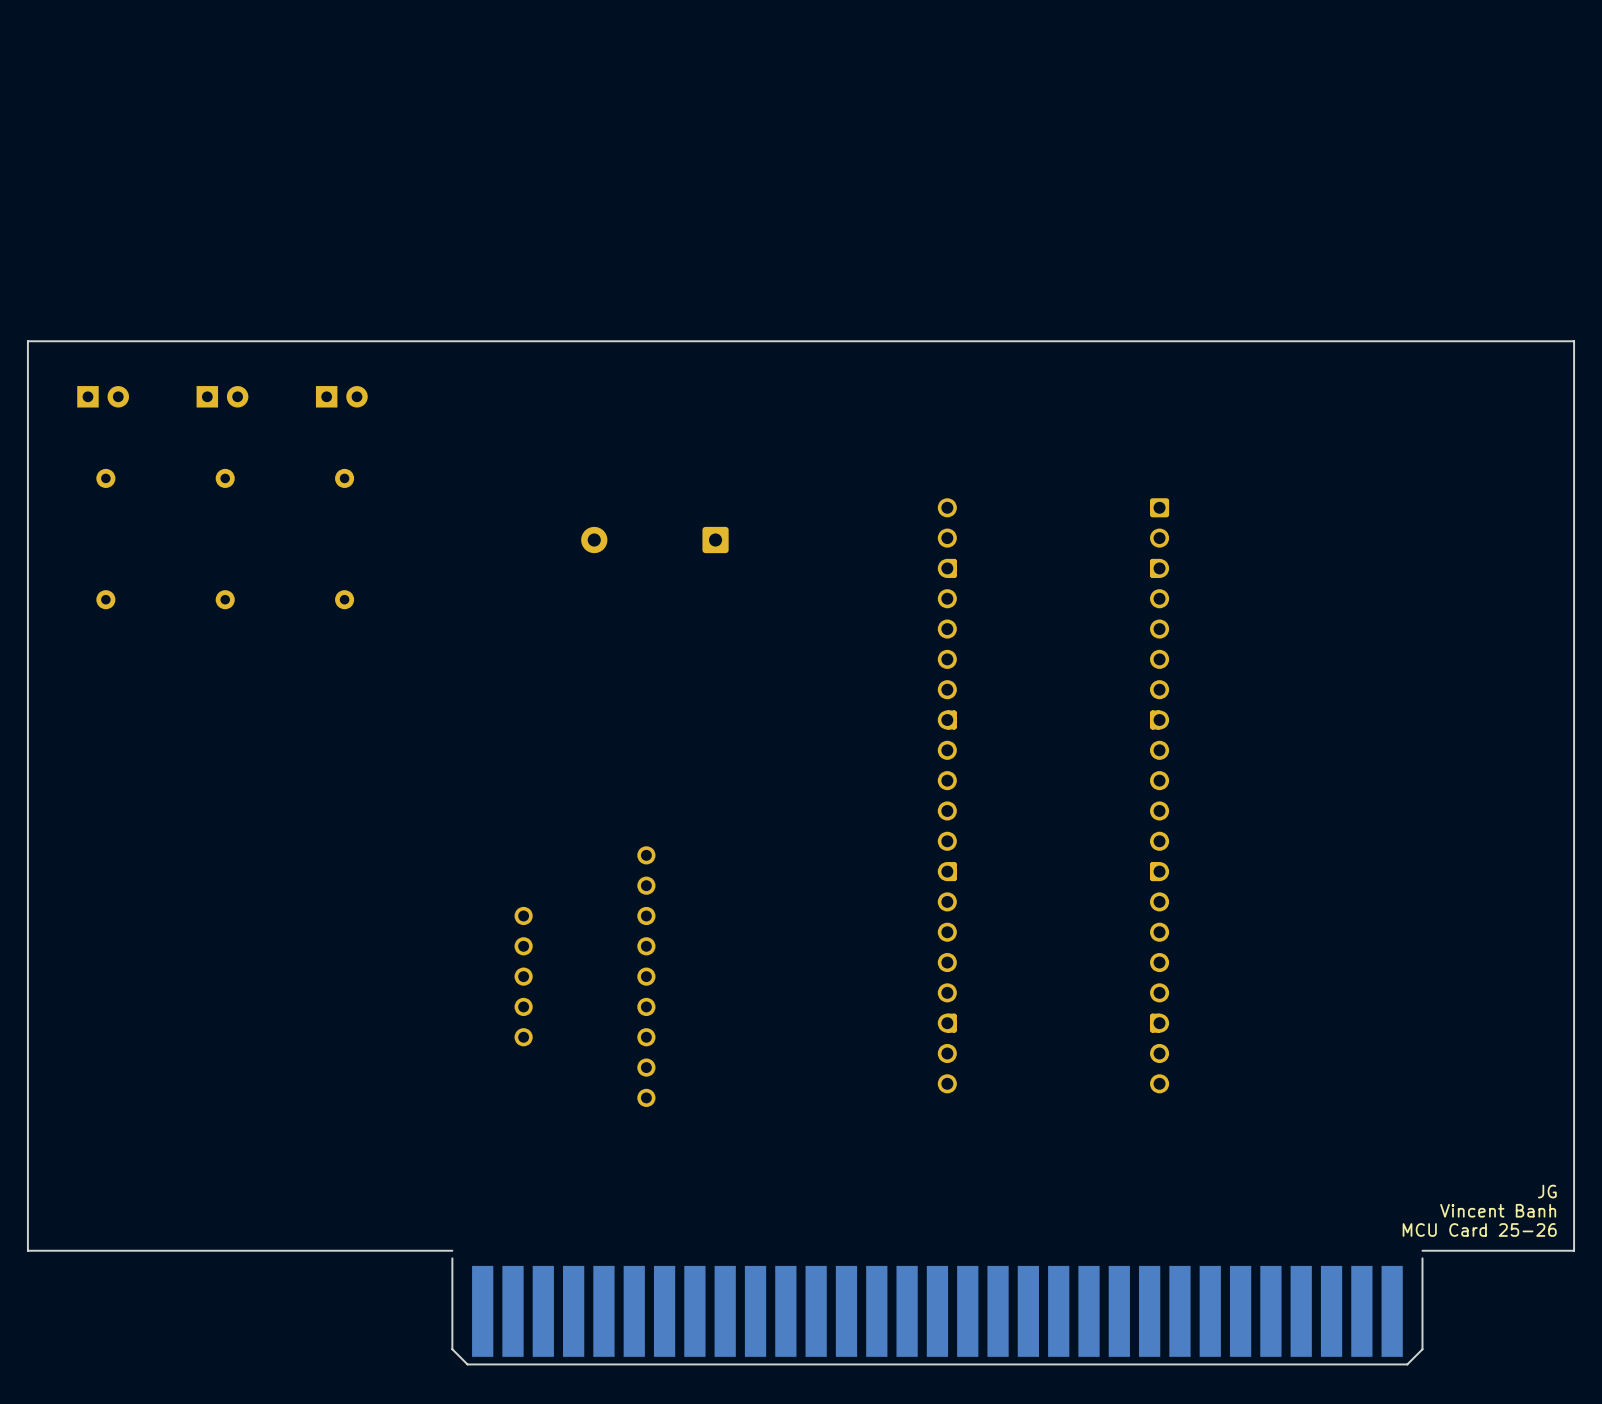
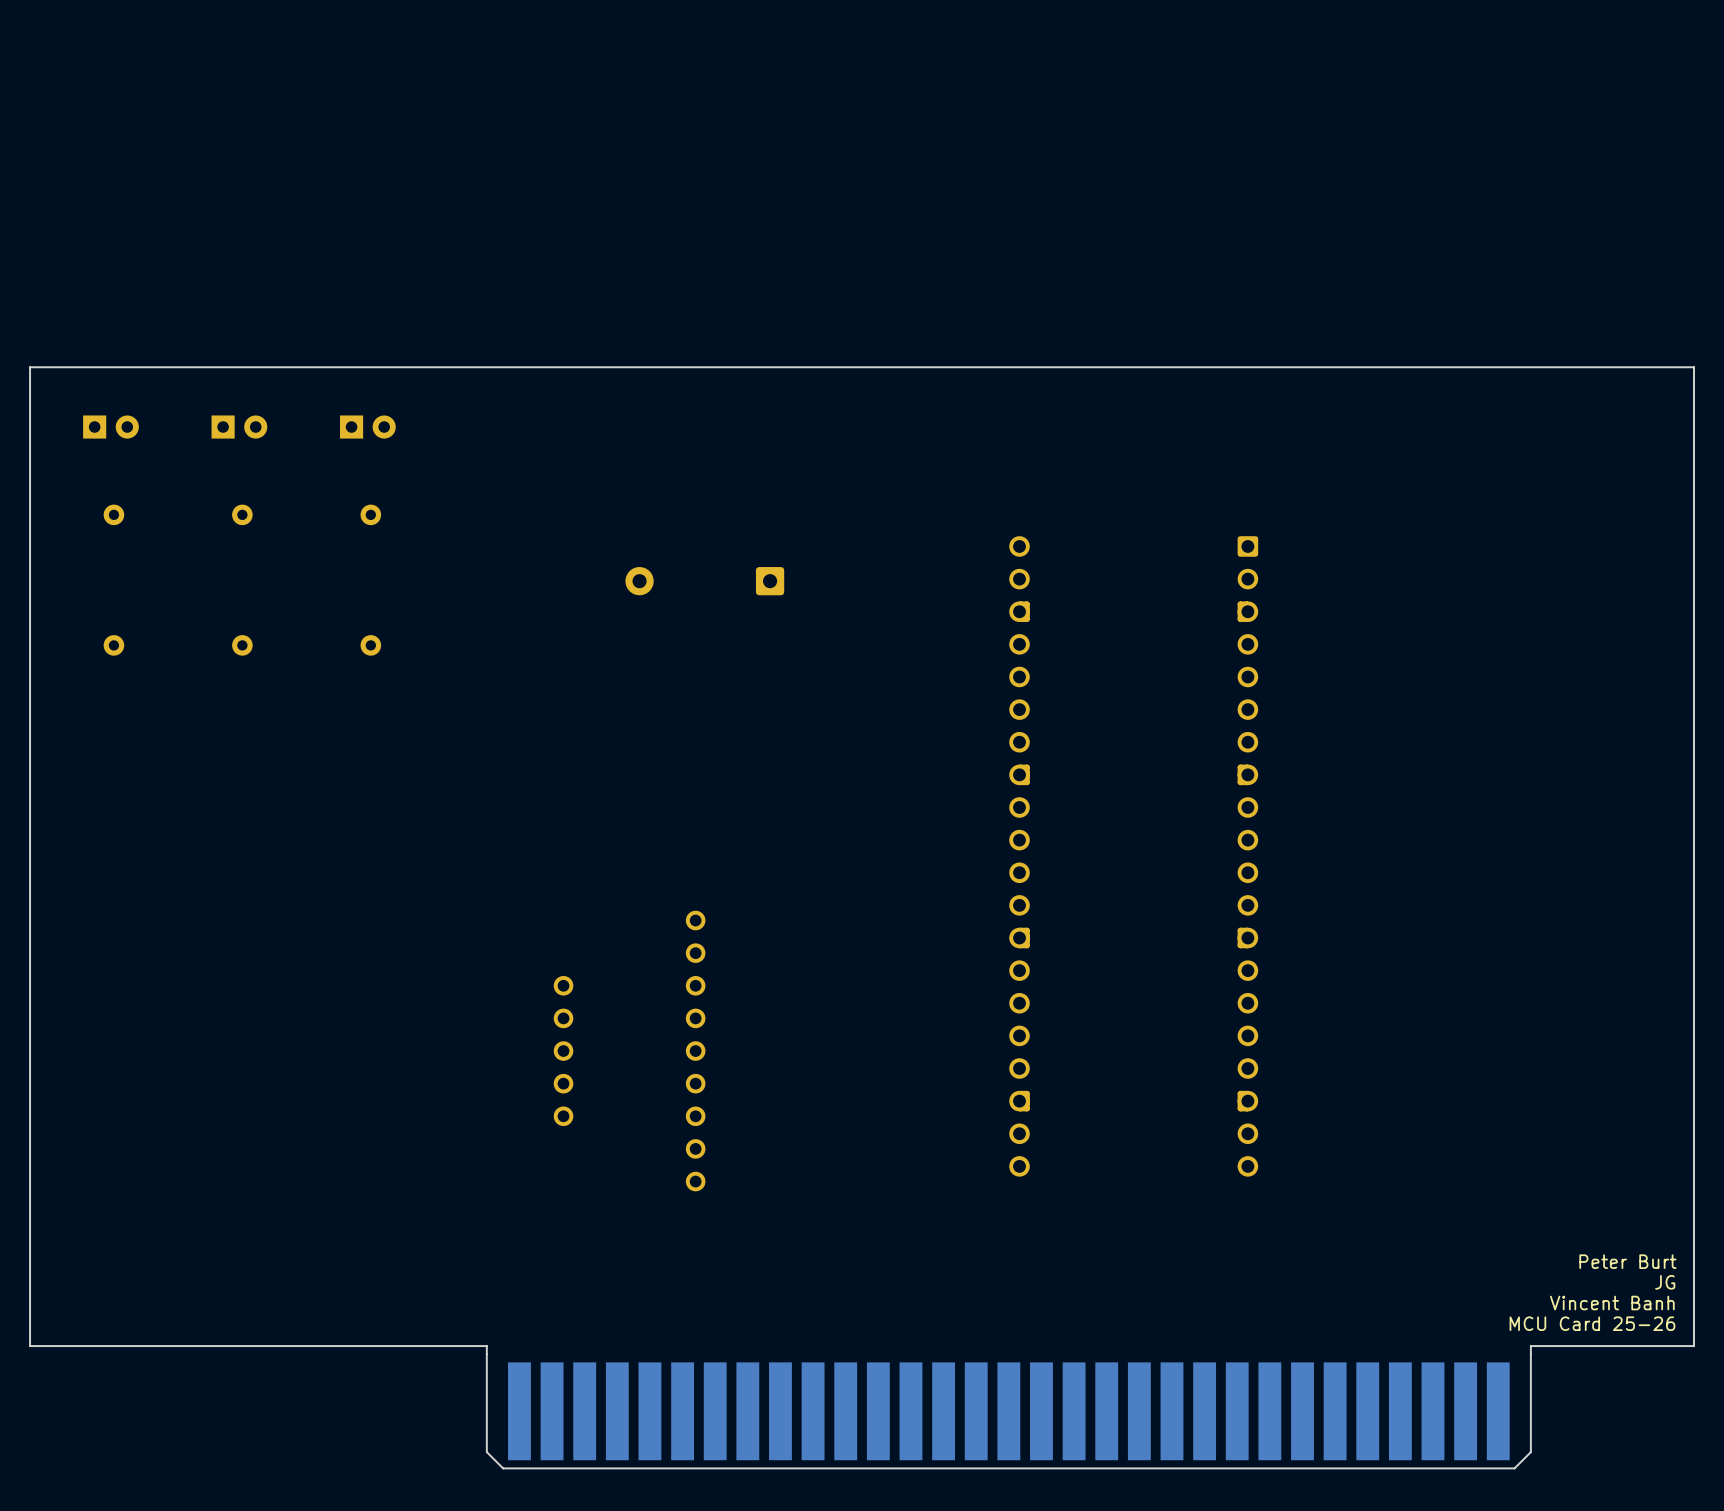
text: none -> Peter Burt (1627, 1261)
board edge: none -> (486, 1346) (486, 1354)
board edge: none -> (1530, 1346) (1530, 1354)

